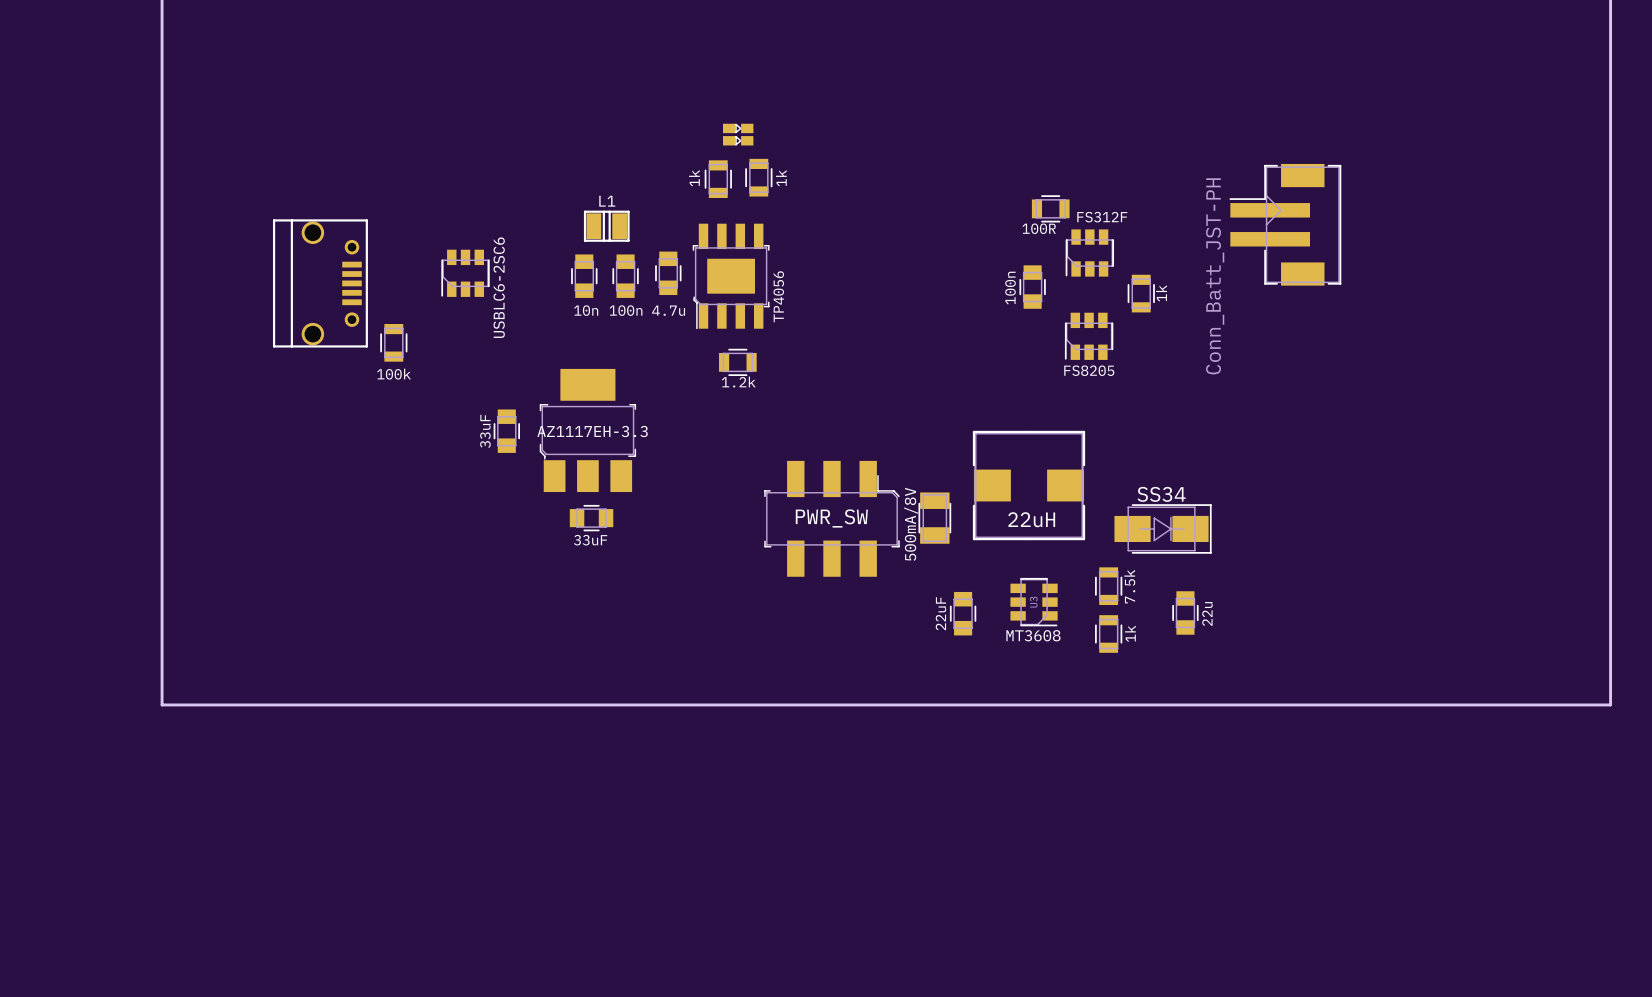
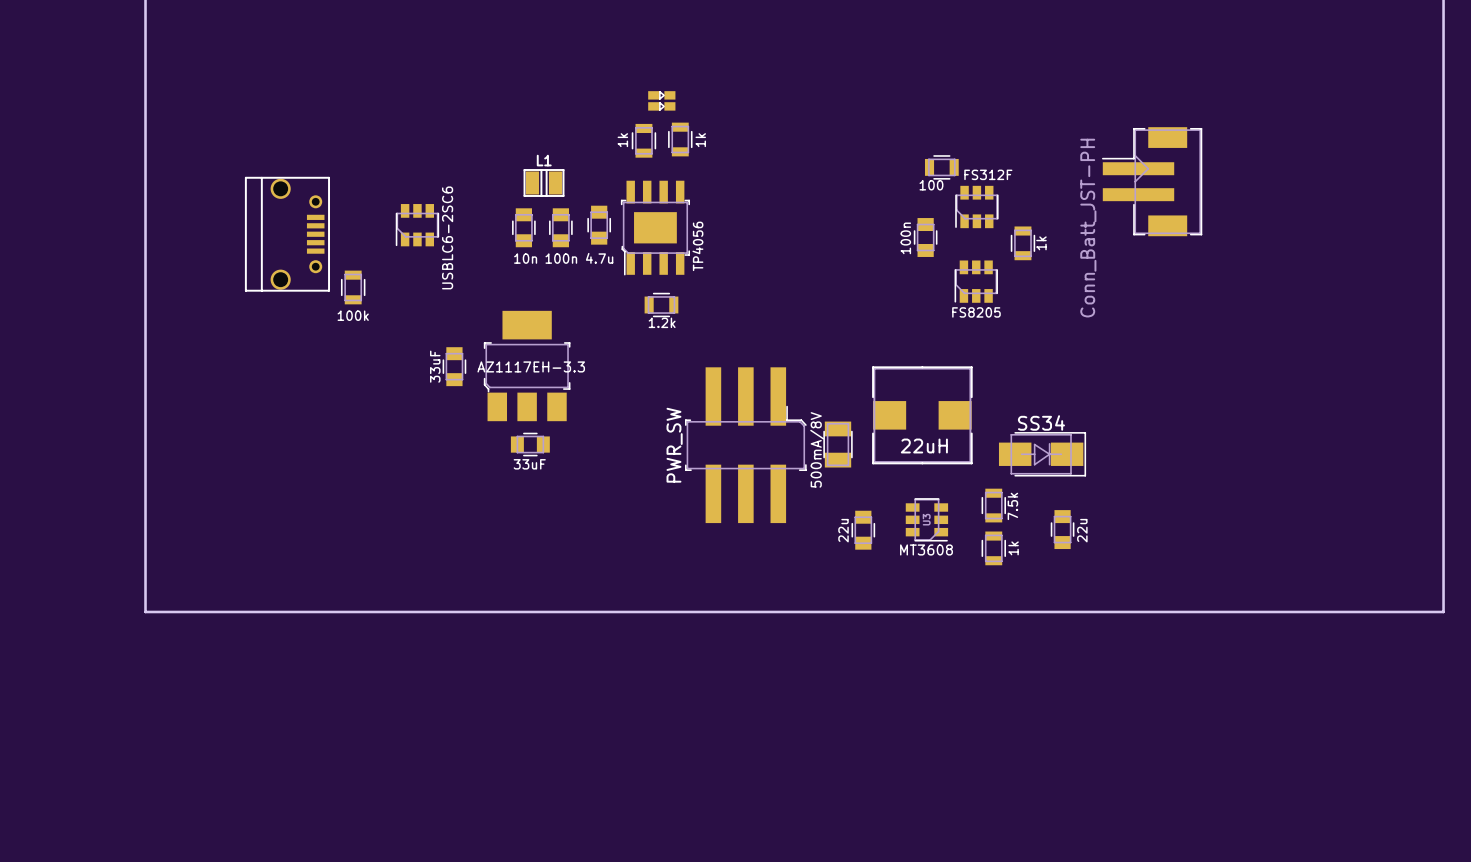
part value: 100R (1039, 228) -> 100 (931, 185)
part footprint: [764, 460, 900, 577] -> [685, 367, 807, 524]
part value position: PWR_SW (831, 518) -> PWR_SW (674, 445)
part value: 22uF (940, 613) -> 22u (843, 530)

